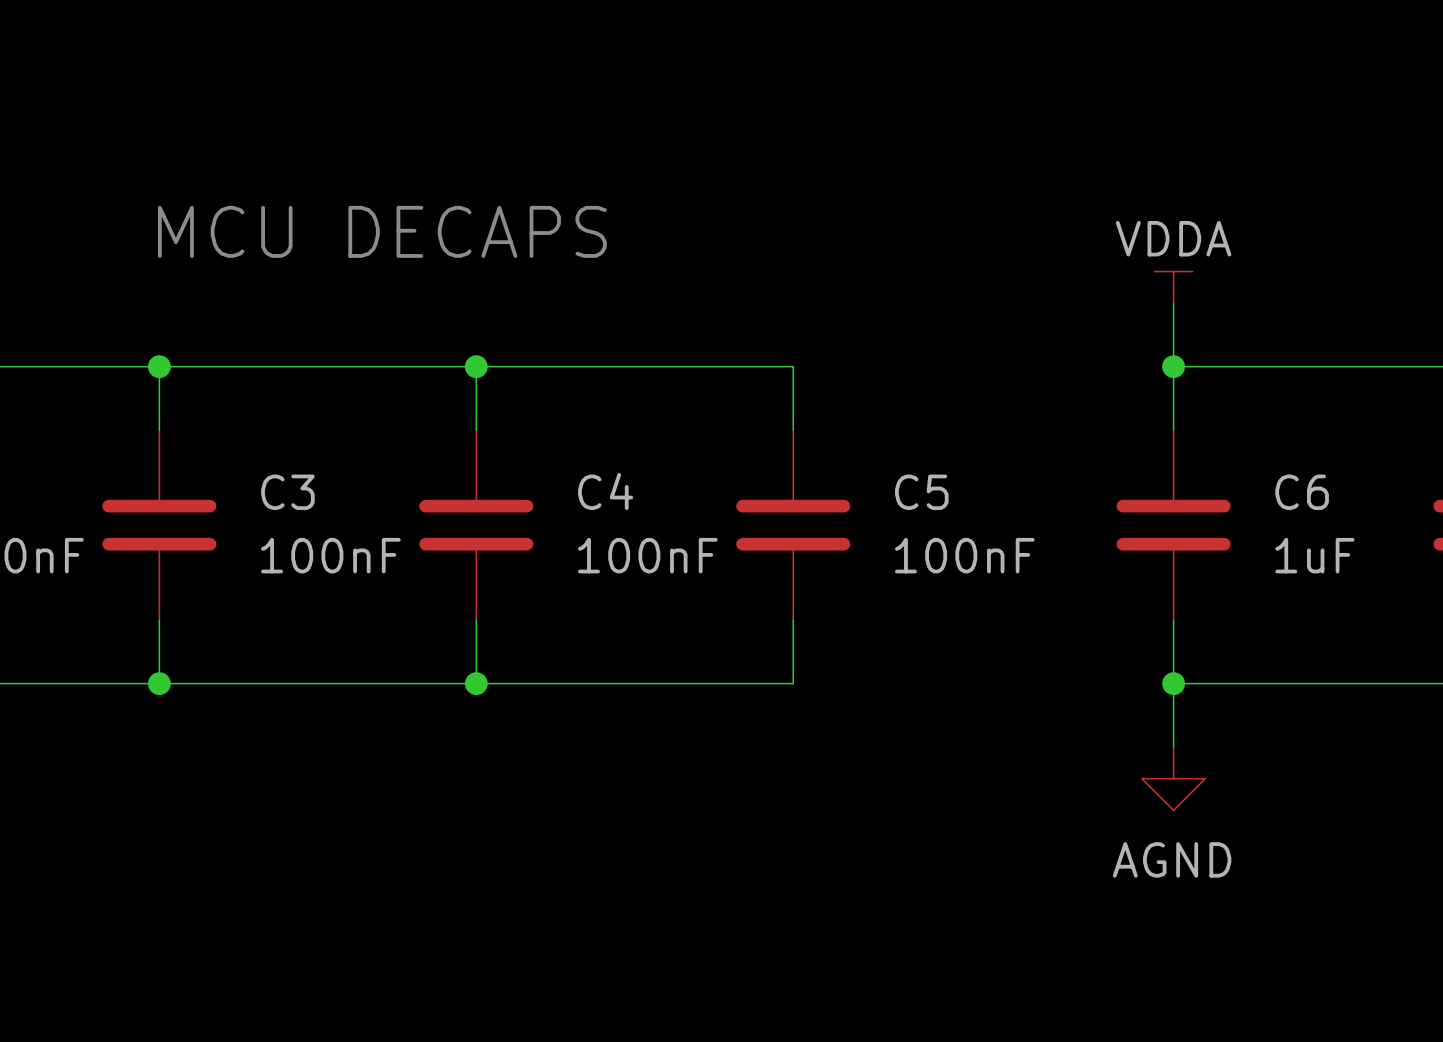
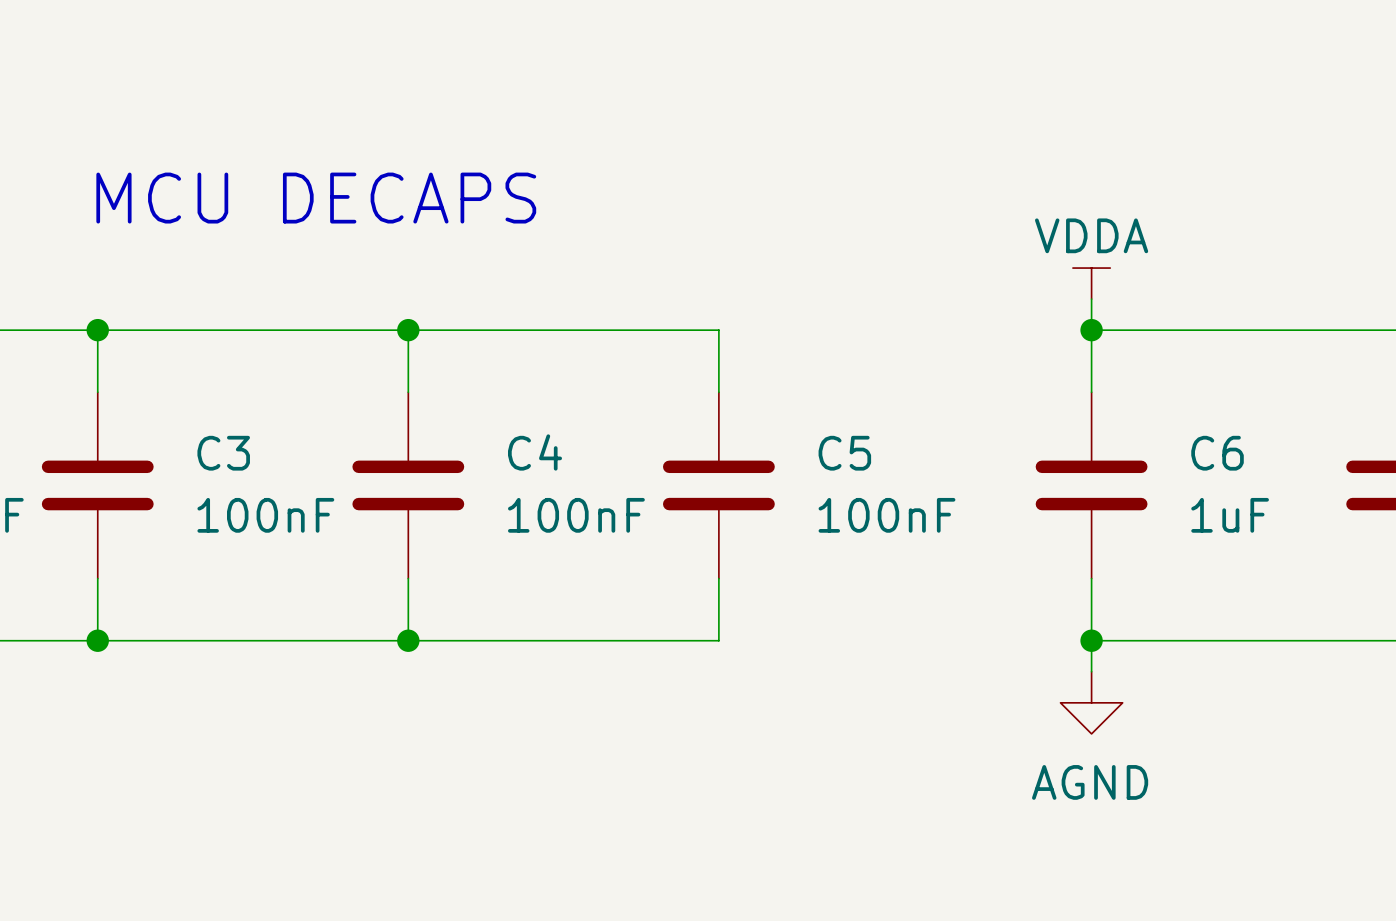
power symbol position: VDDA (1173, 287) -> VDDA (1091, 283)
power symbol position: AGND (1173, 778) -> AGND (1091, 702)

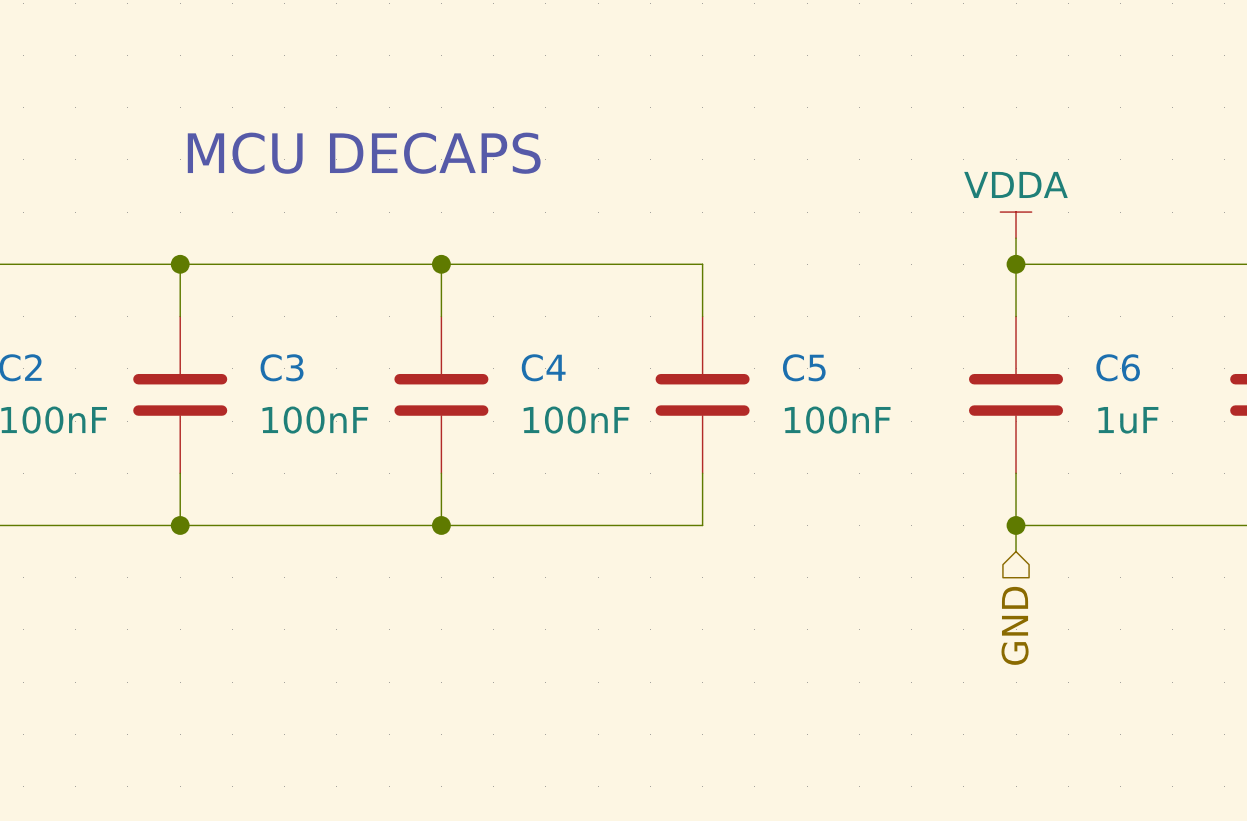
power symbol: AGND (1091, 702) -> none
hierarchical label: none -> GND (1015, 625)

